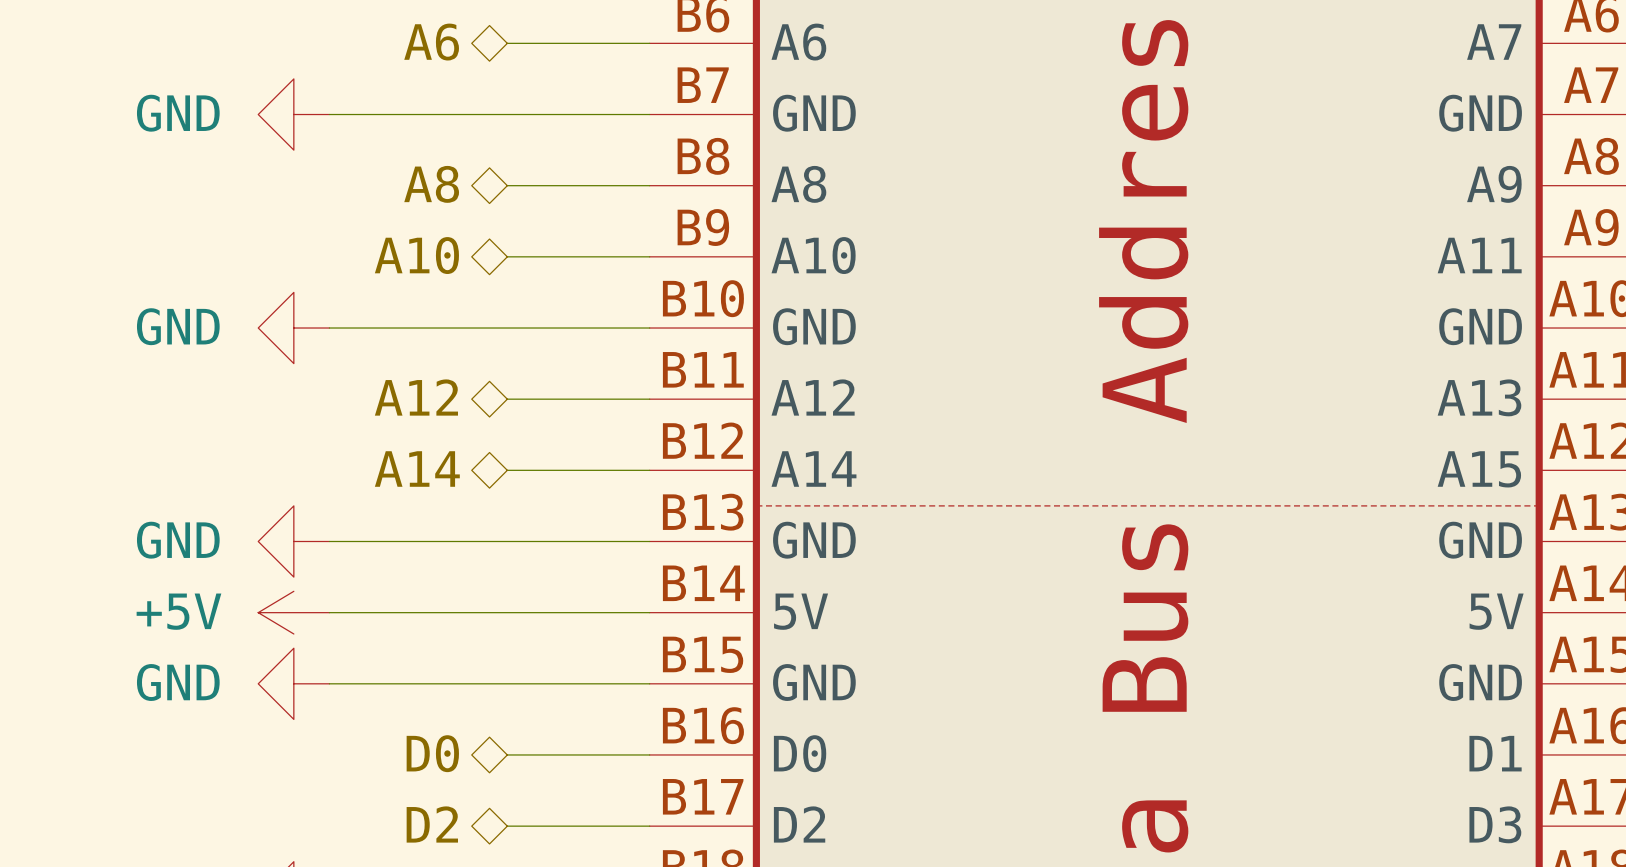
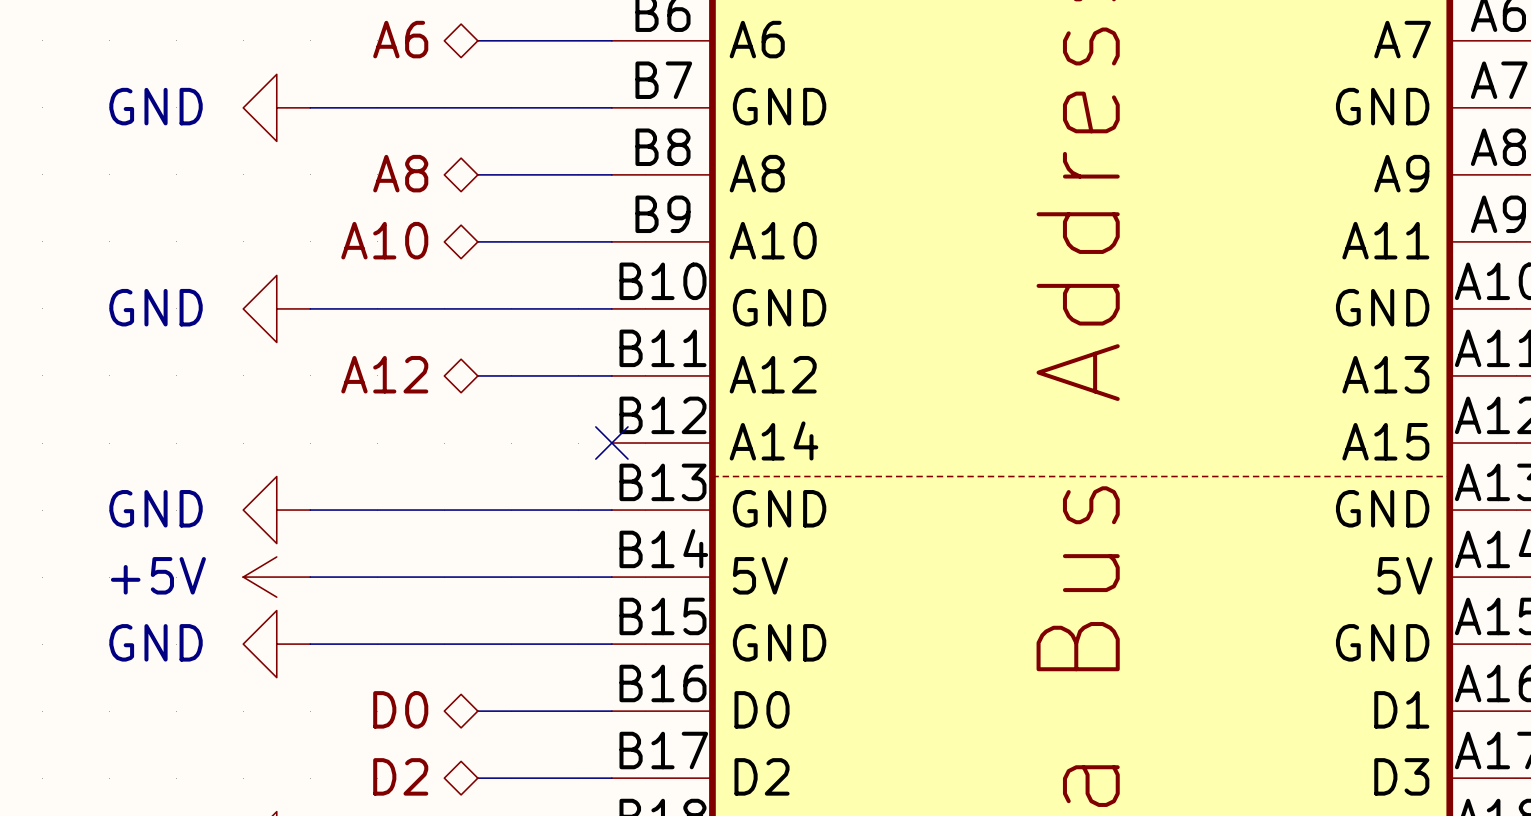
hierarchical label: A14 (417, 469) -> none
wire: (507, 470) (649, 470) -> none
no-connect mark: none -> (611, 443)

